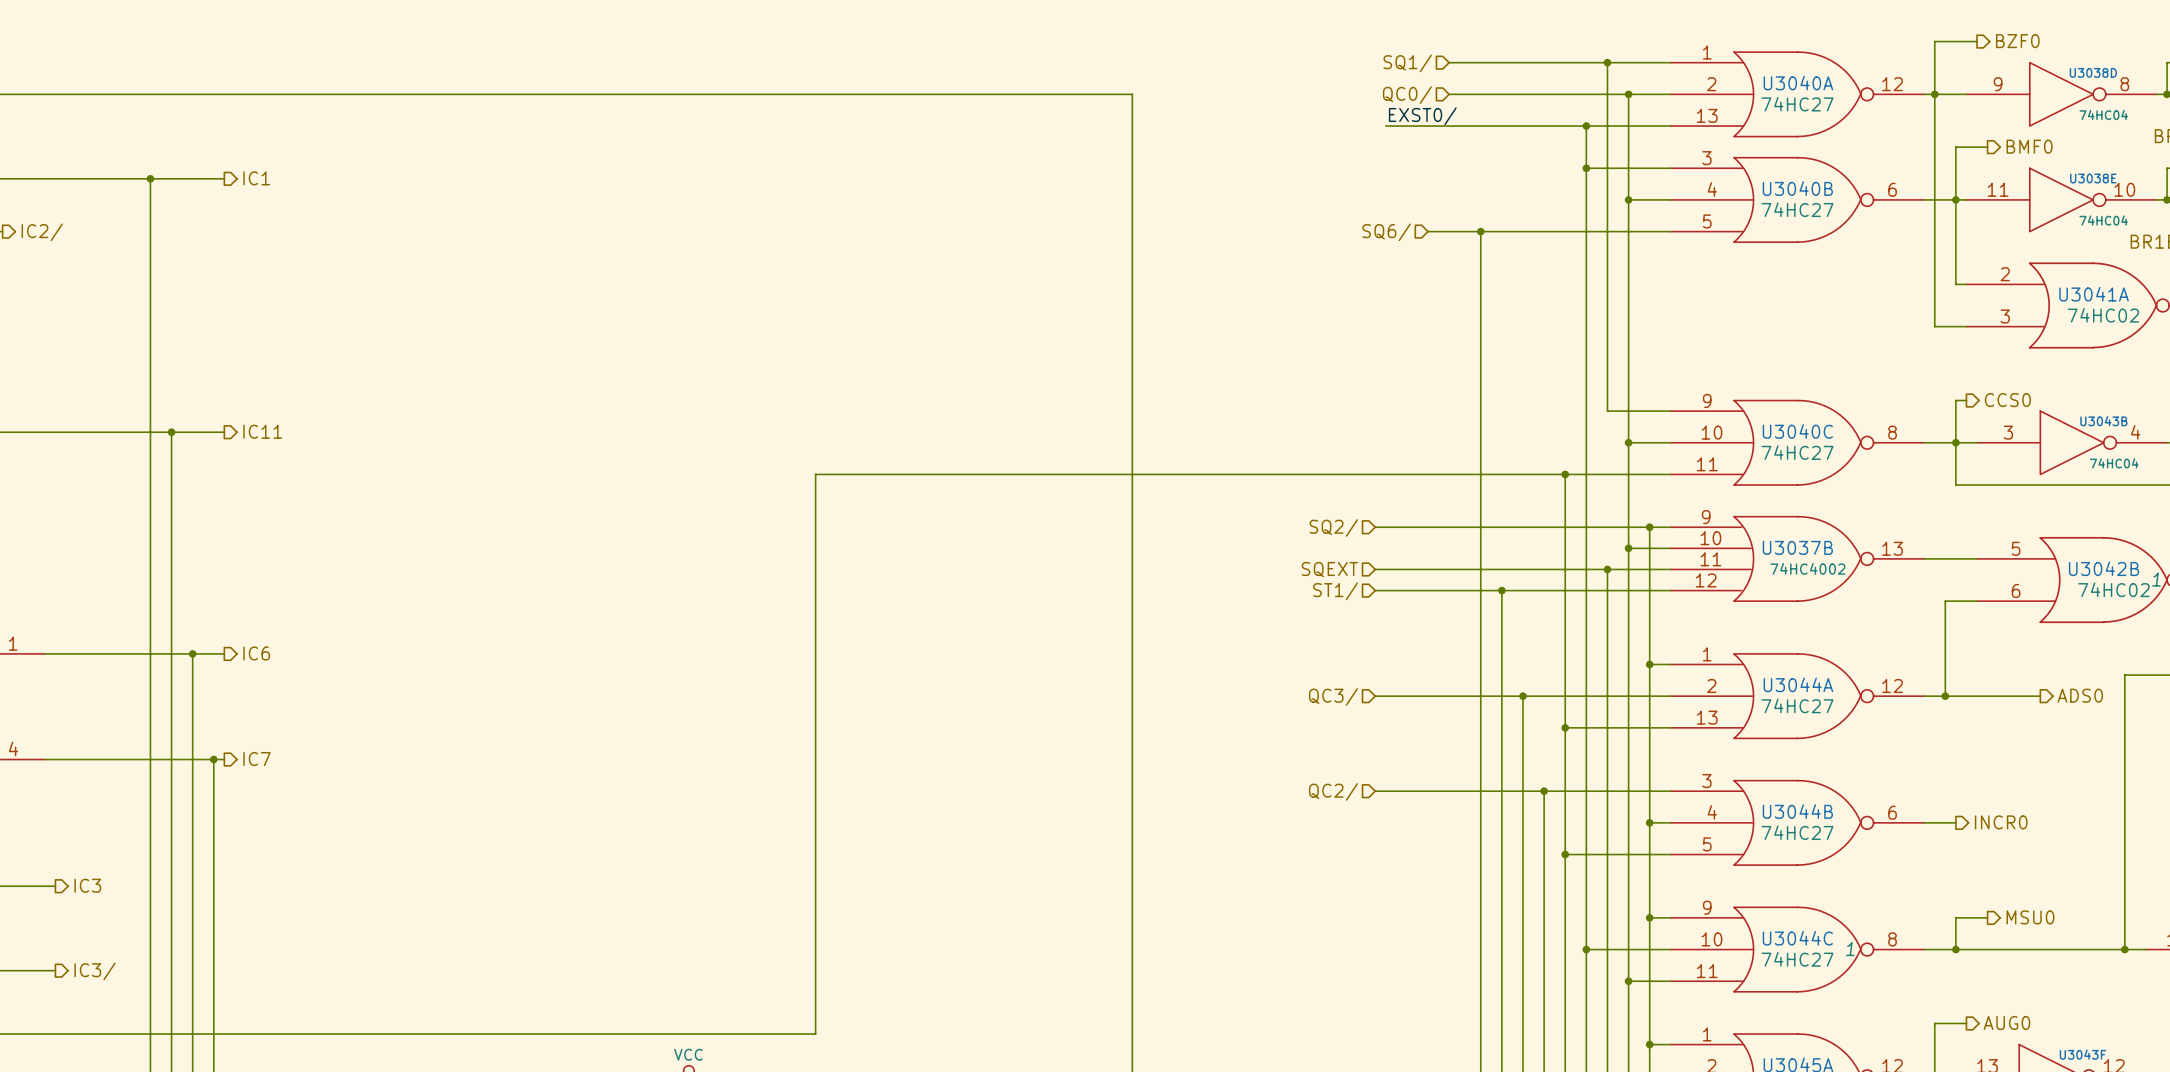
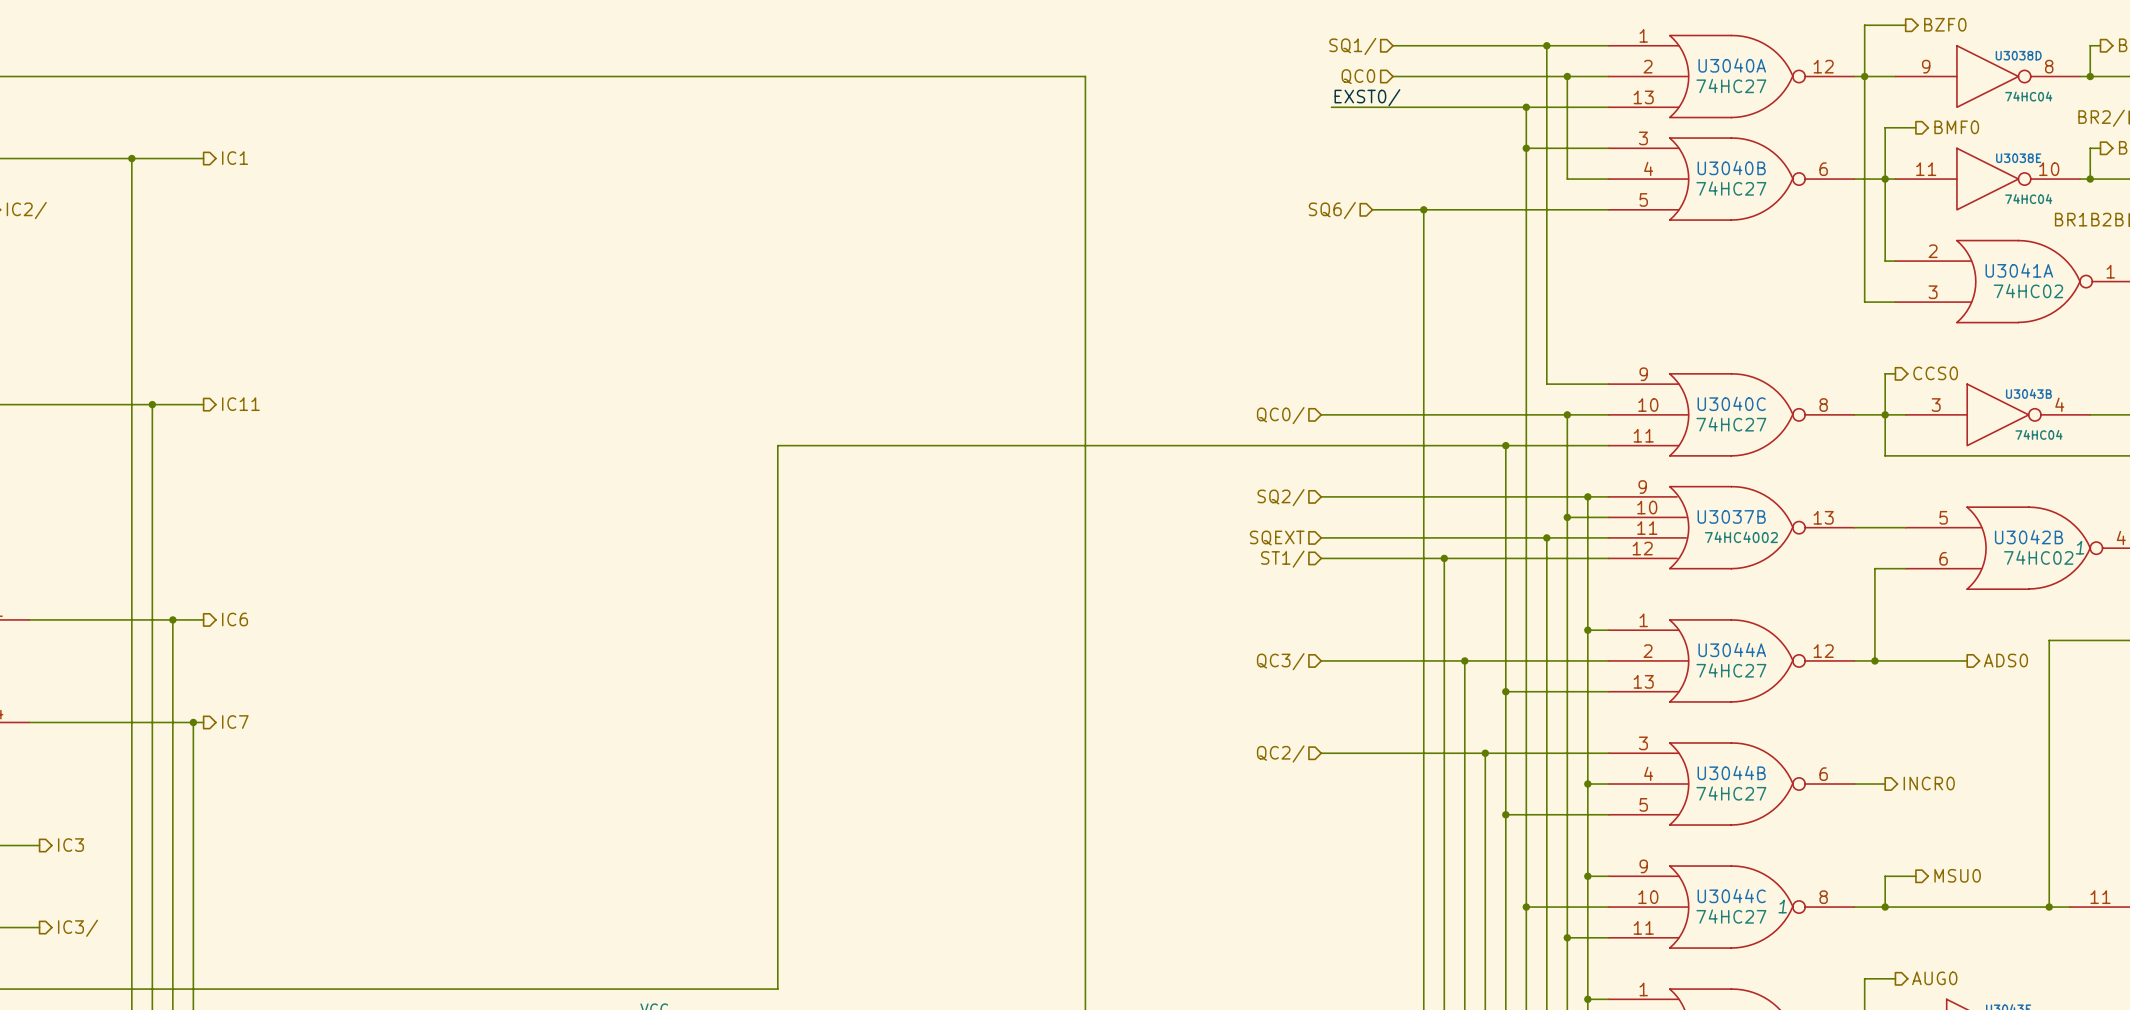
hierarchical label: QC0/ (1407, 95) -> QC0 (1358, 76)
wire: (1628, 199) (1628, 442) -> (1321, 414) (1567, 414)
junction: (1628, 199) -> none
hierarchical label: none -> QC0/ (1280, 415)

